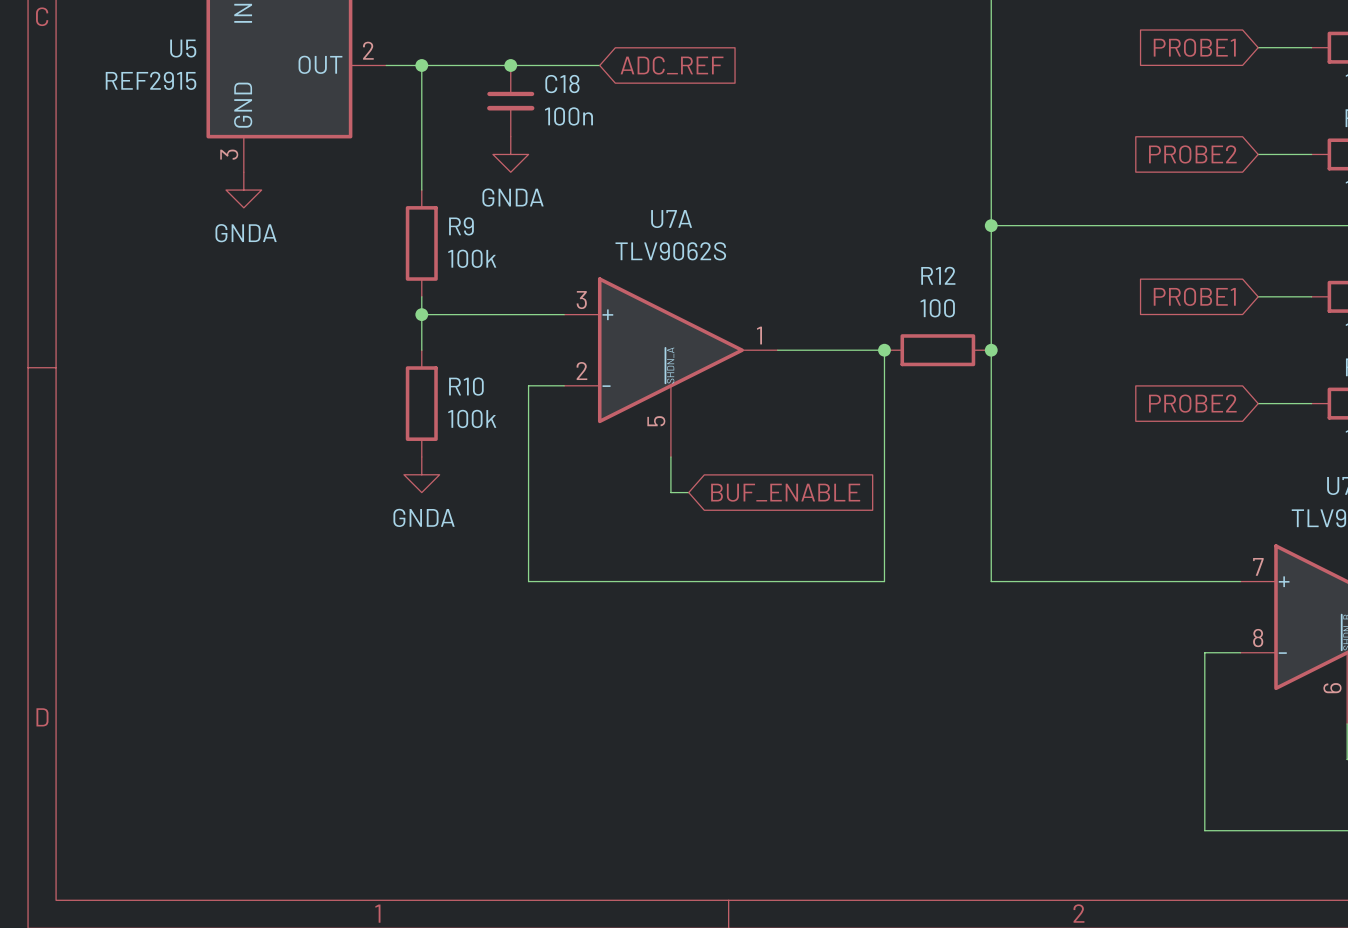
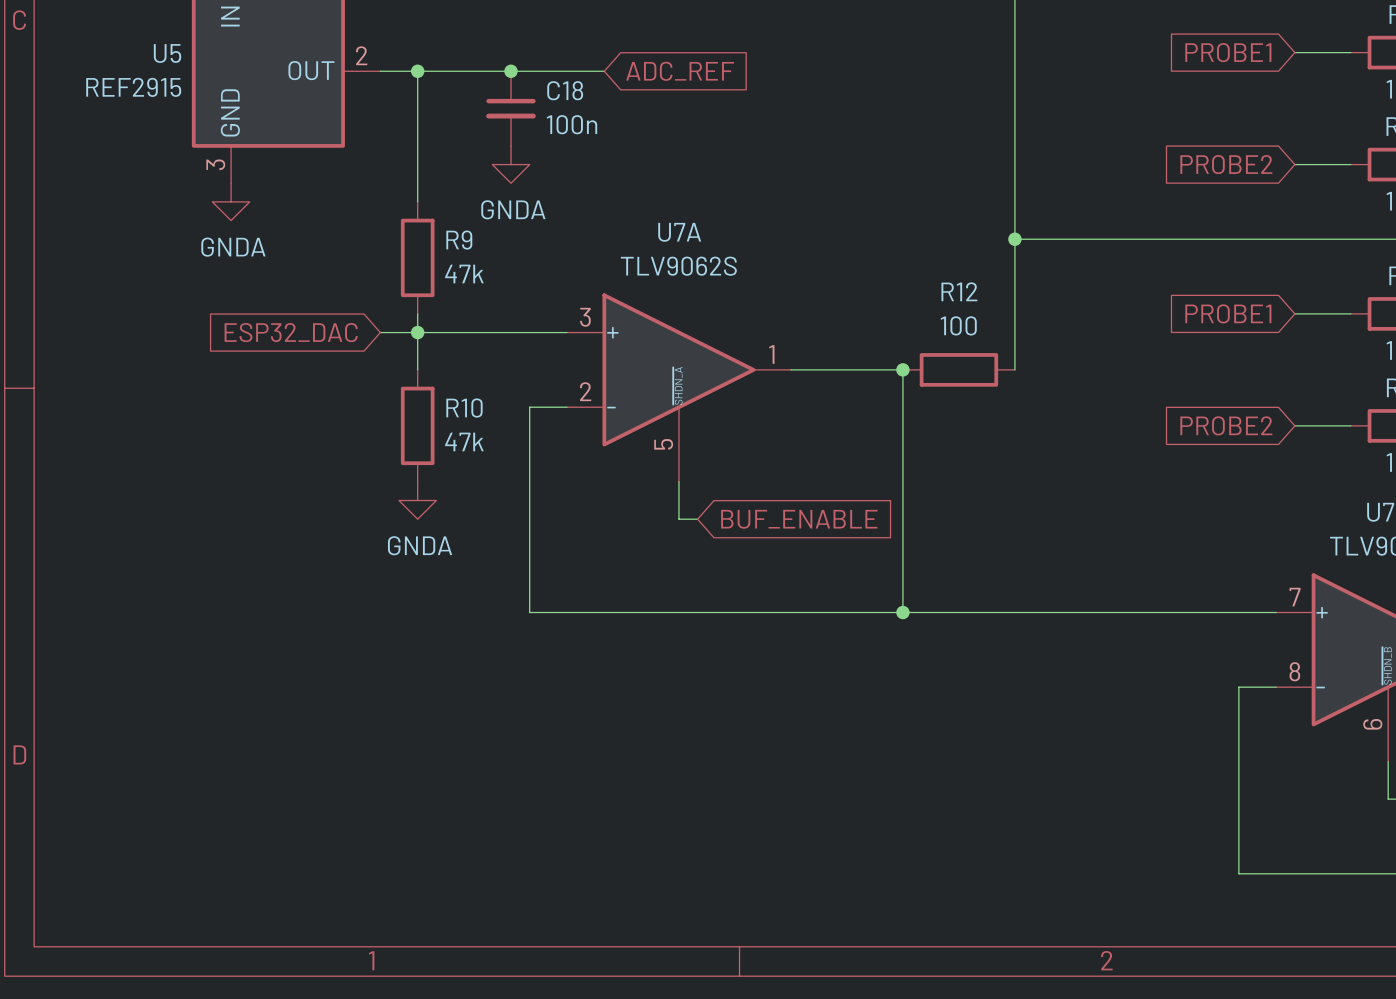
R9 value: 100k (472, 258) -> 47k (464, 274)
global label: none -> ESP32_DAC (291, 332)
wire: none -> (380, 332) (417, 332)
wire: (991, 350) (991, 581) -> (902, 612) (1014, 612)
junction: (991, 350) -> none
R10 value: 100k (472, 418) -> 47k (464, 441)
junction: none -> (902, 612)

